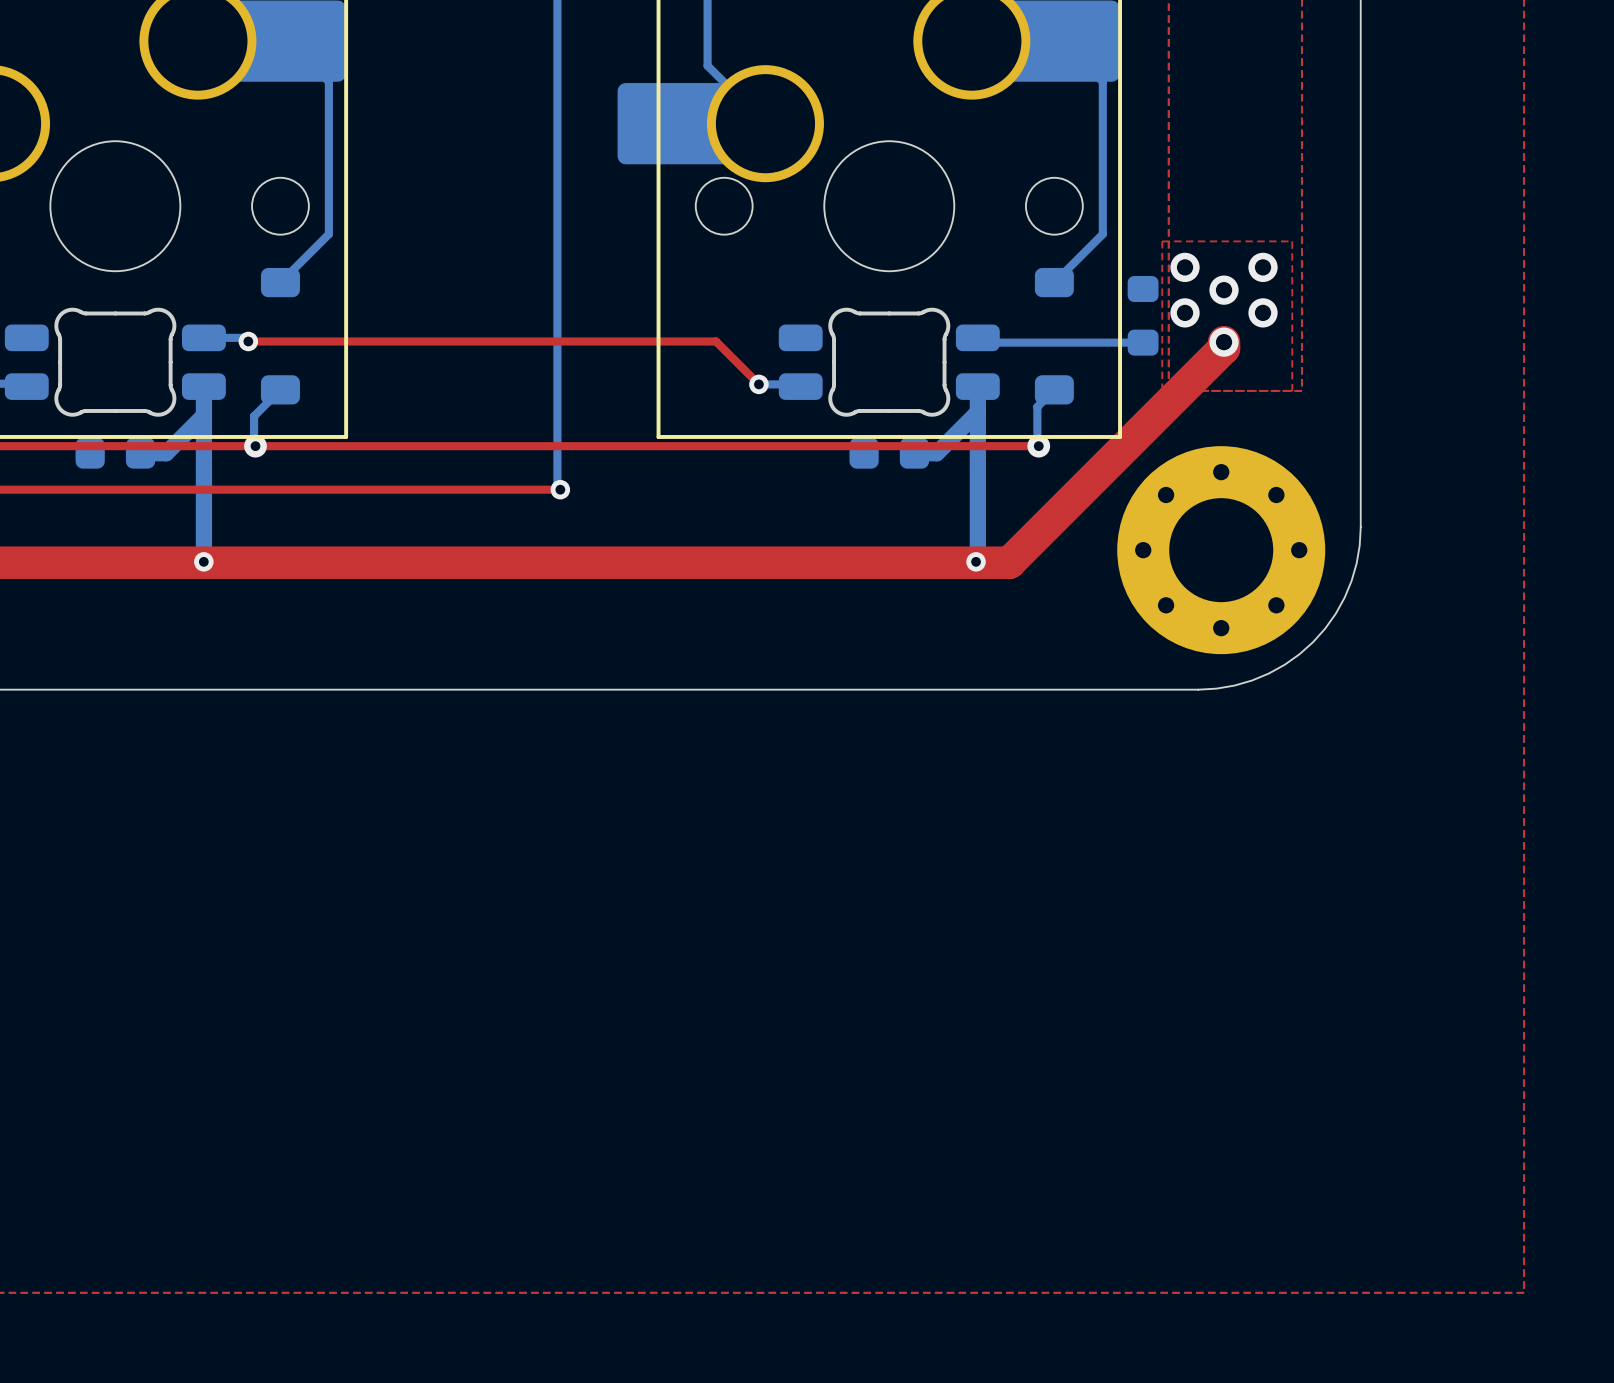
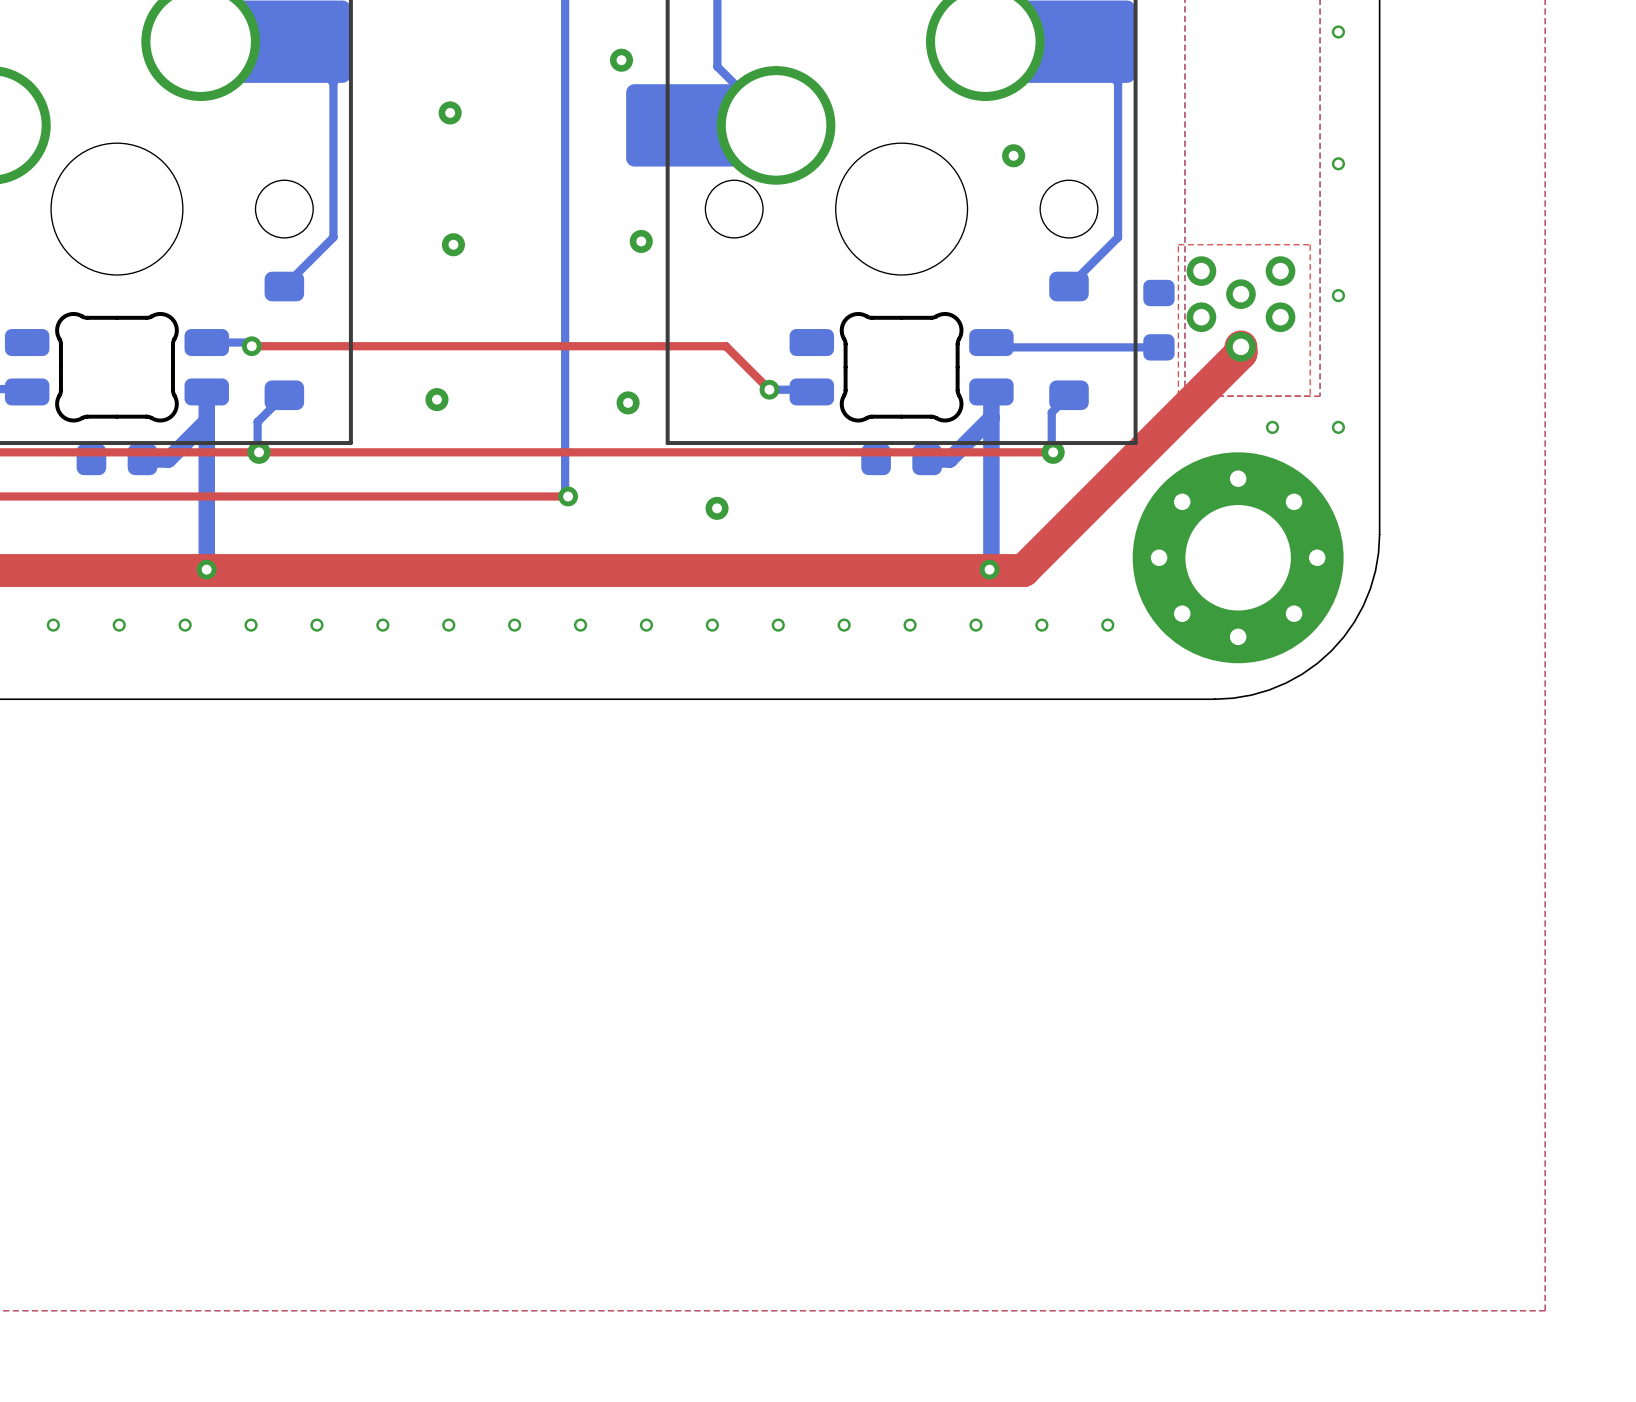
via: none -> (1338, 31)
via: none -> (621, 60)
via: none -> (450, 112)
via: none -> (1013, 155)
via: none -> (1338, 163)
via: none -> (641, 241)
via: none -> (453, 244)
via: none -> (1338, 295)
via: none -> (436, 399)
via: none -> (628, 402)
via: none -> (1272, 427)
via: none -> (1338, 427)
via: none -> (717, 508)
via: none -> (53, 625)
via: none -> (119, 625)
via: none -> (185, 625)
via: none -> (251, 625)
via: none -> (316, 625)
via: none -> (382, 625)
via: none -> (448, 625)
via: none -> (514, 625)
via: none -> (580, 625)
via: none -> (646, 625)
via: none -> (712, 625)
via: none -> (778, 625)
via: none -> (844, 625)
via: none -> (910, 625)
via: none -> (975, 625)
via: none -> (1041, 625)
via: none -> (1107, 625)

